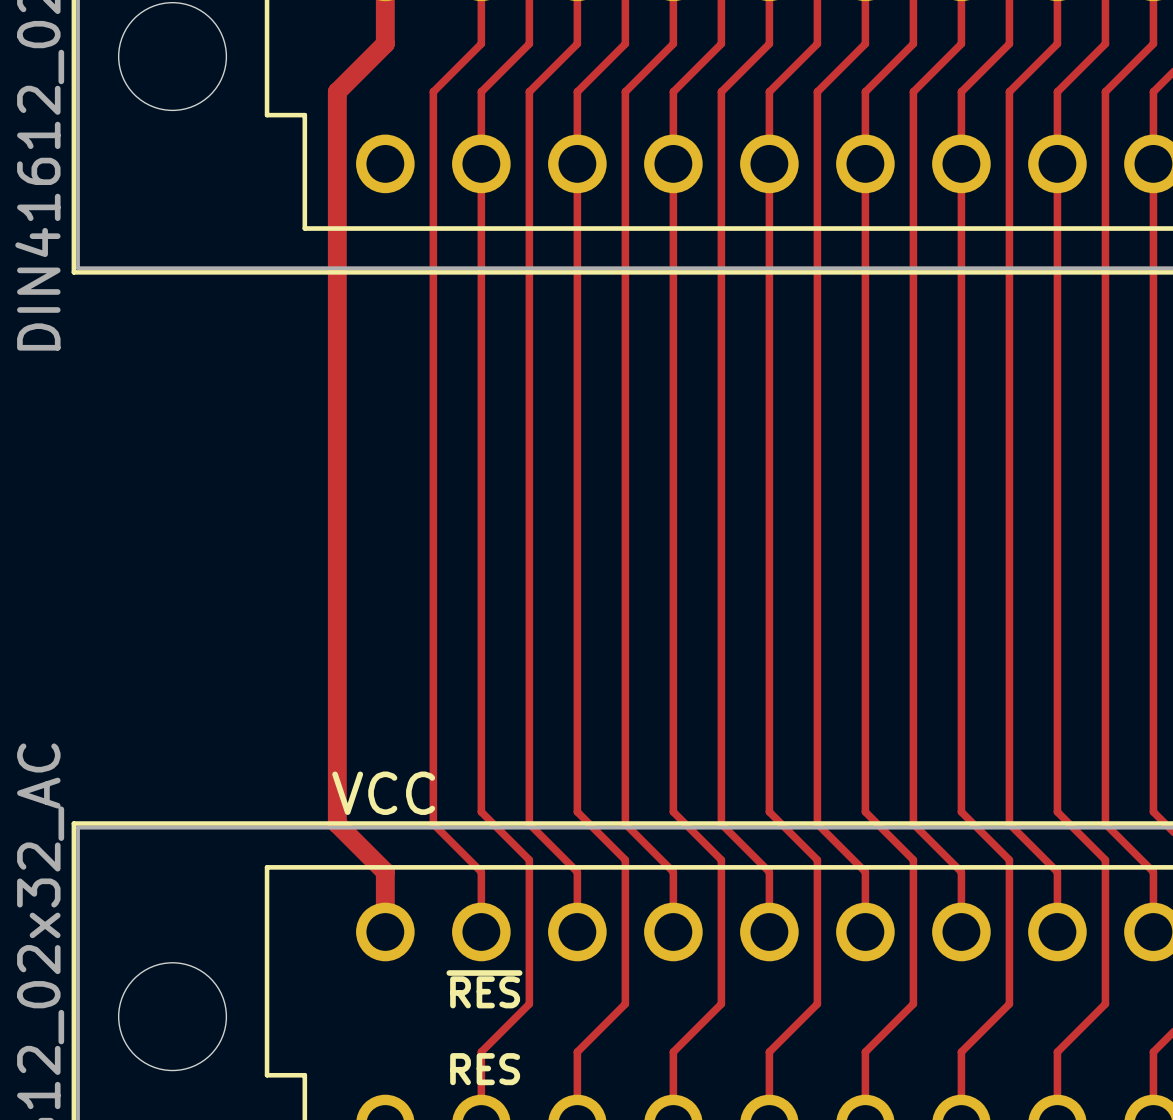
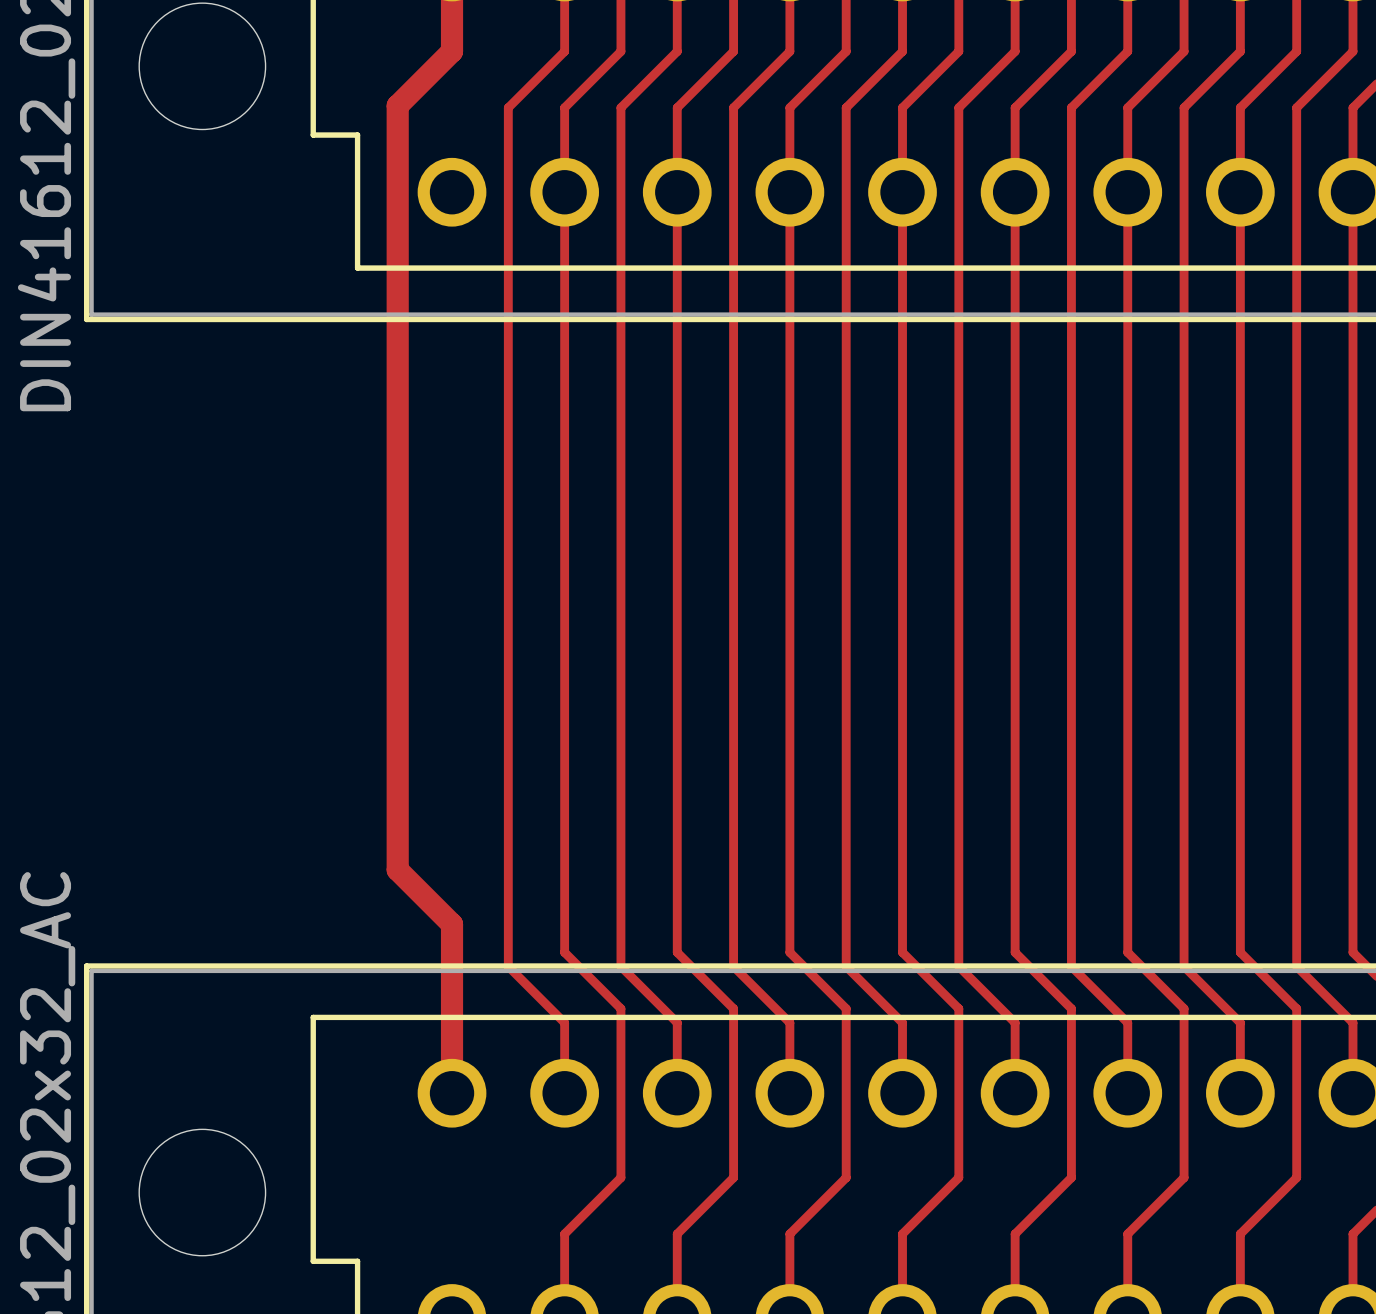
top track: (339, 90) (337, 91) (337, 823) (385, 871) -> (397, 105) (397, 869) (452, 924) (452, 1022)
text: VCC (383, 793) -> none
text: ~{RES} (484, 989) -> none
text: RES (485, 1069) -> none

